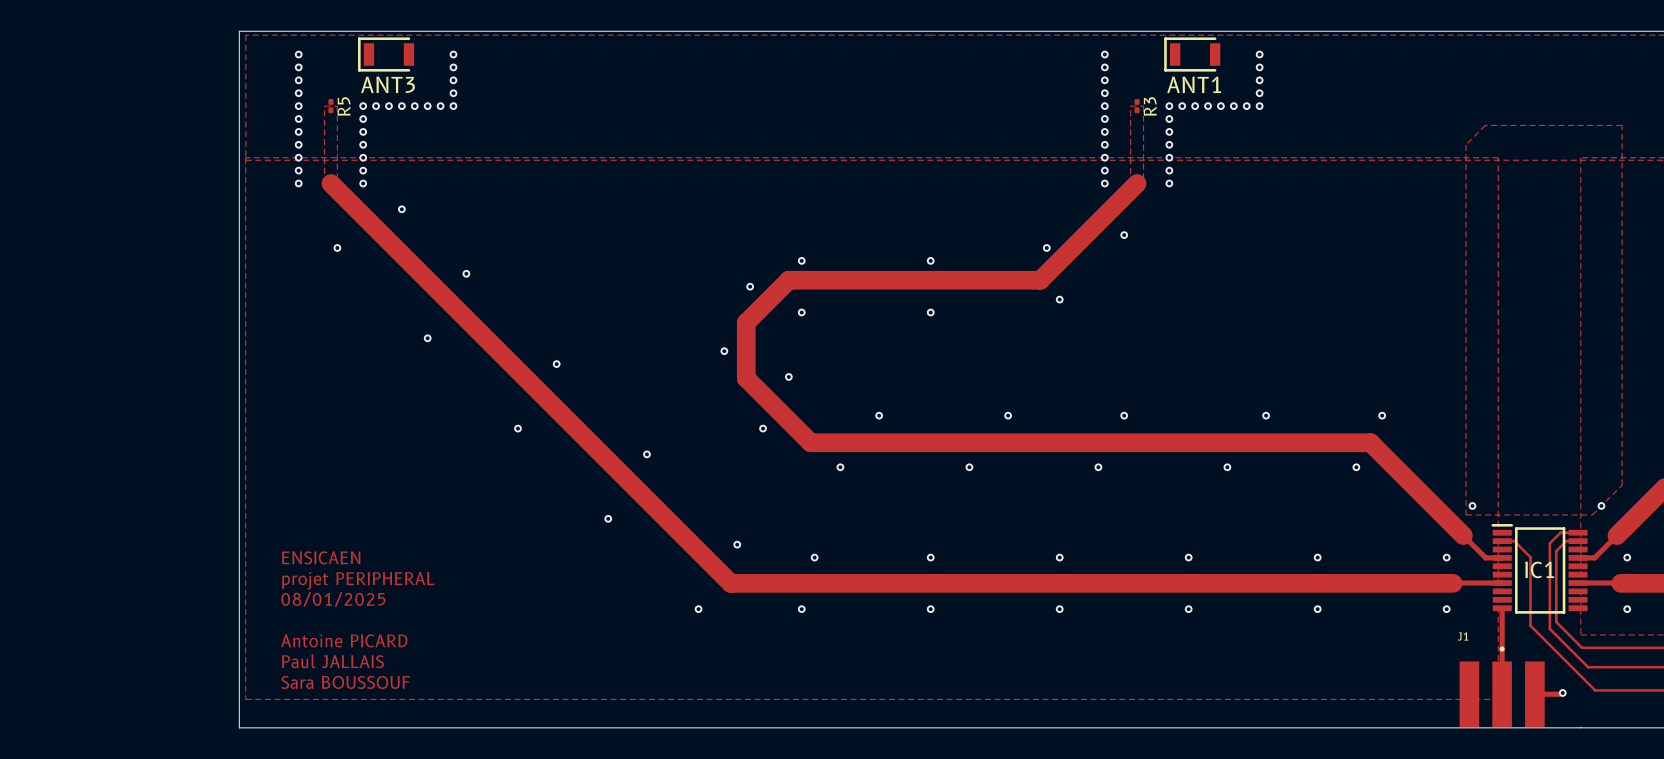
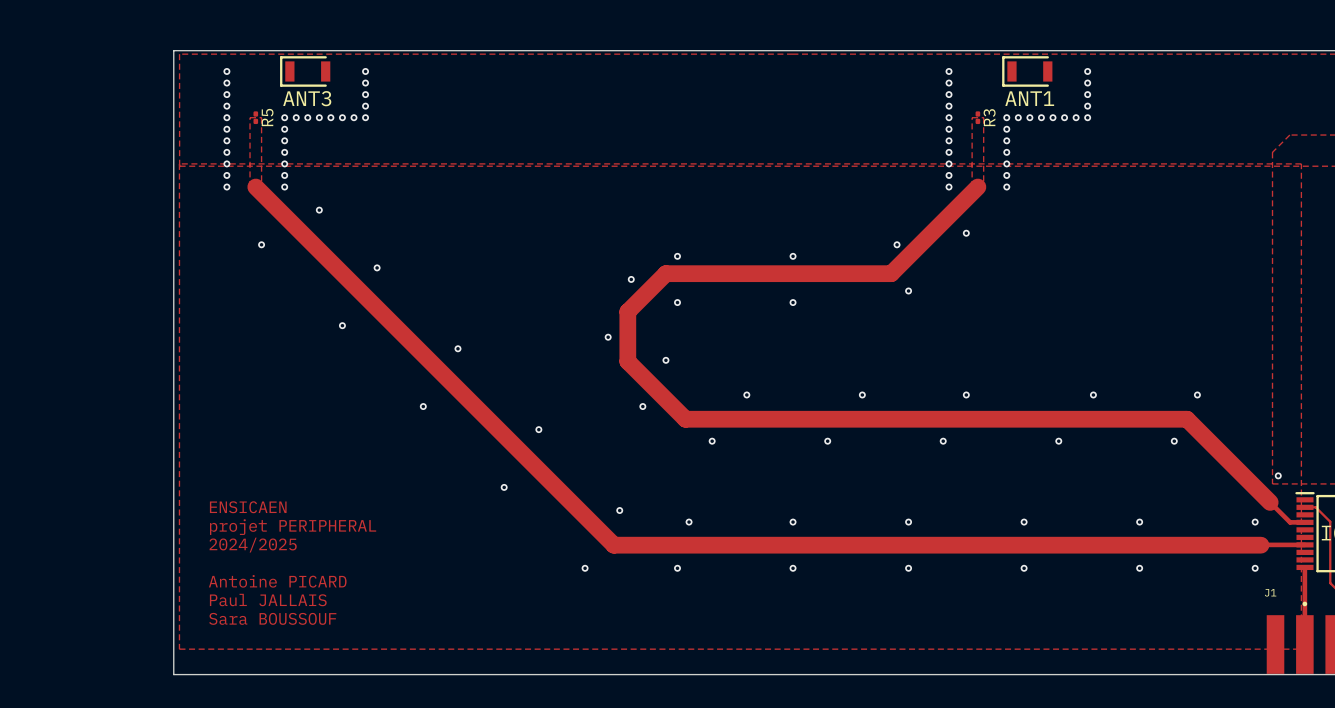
text: none -> ENSICAEN (248, 507)
text: ENSICAEN (321, 557) -> projet PERIPHERAL (293, 527)
text: projet PERIPHERAL (358, 580) -> 2024/2025 (253, 545)
text: 08/01/2025 (333, 599) -> none
text: none -> Antoine PICARD (277, 581)
text: Antoine PICARD (344, 640) -> Paul JALLAIS (268, 600)
text: Paul JALLAIS (332, 661) -> Sara BOUSSOUF (272, 618)
text: Sara BOUSSOUF (345, 682) -> none

